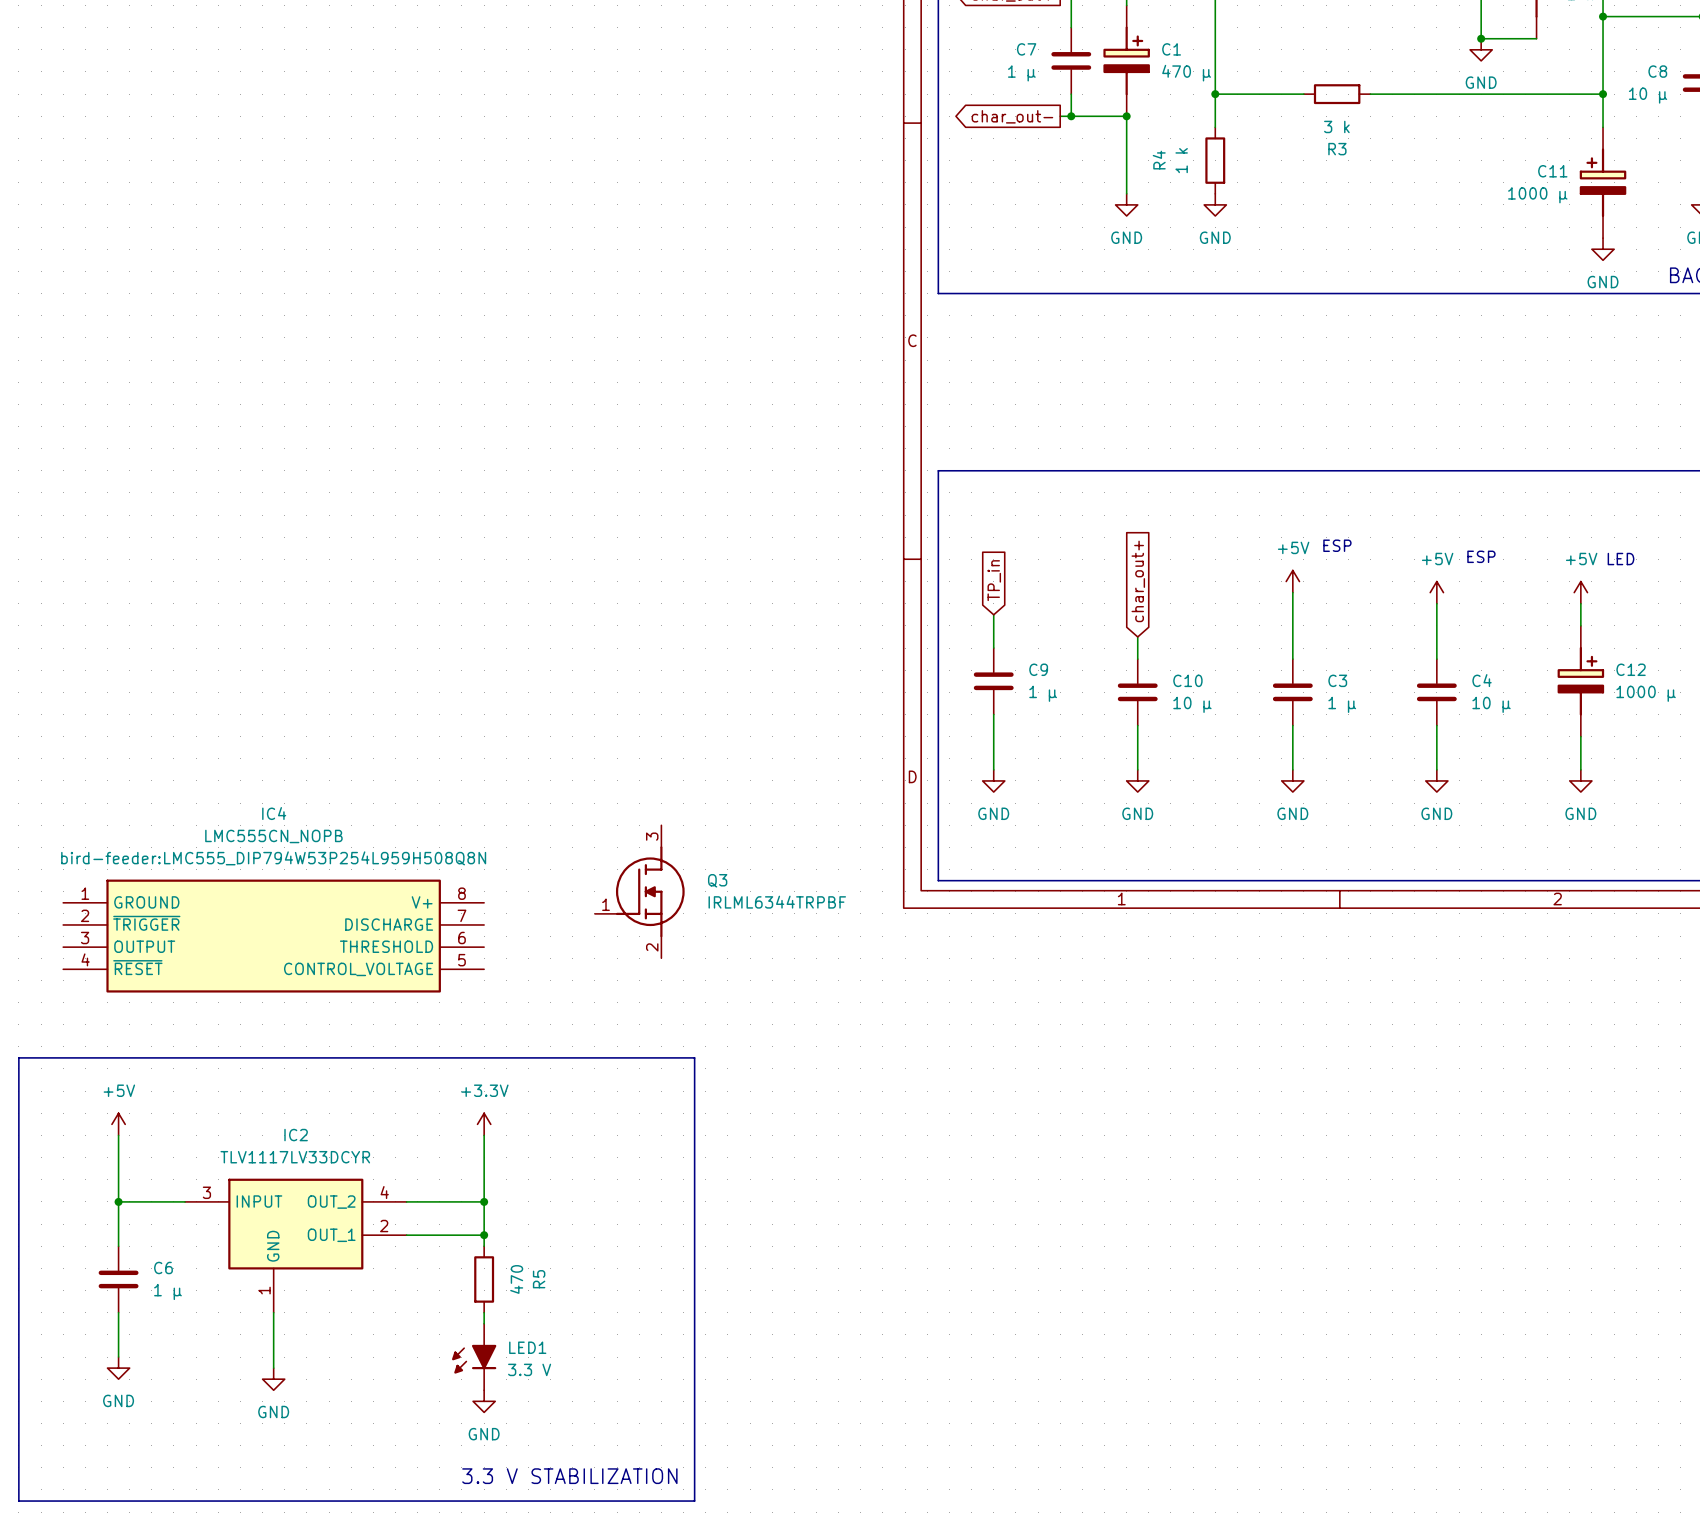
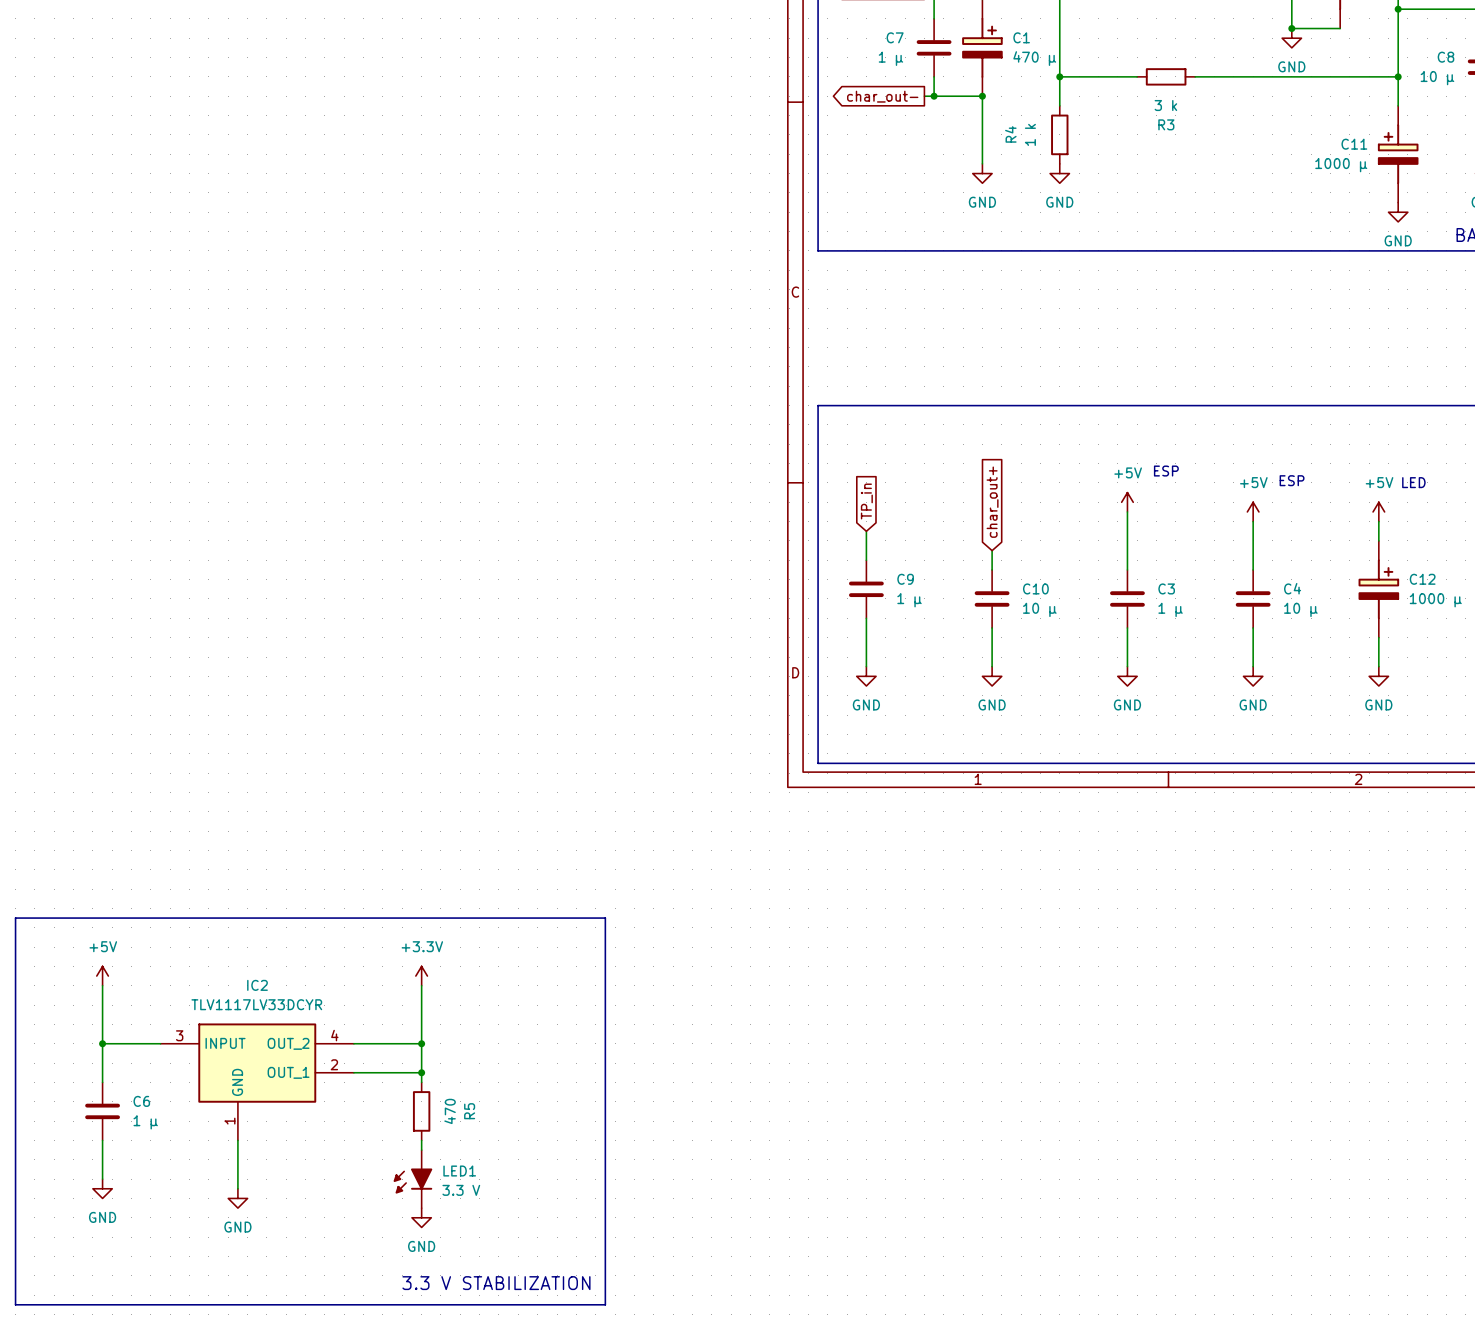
Q3: IRLML6344TRPBF (639, 891) -> none
IC4: LMC555CN_NOPB (273, 936) -> none

